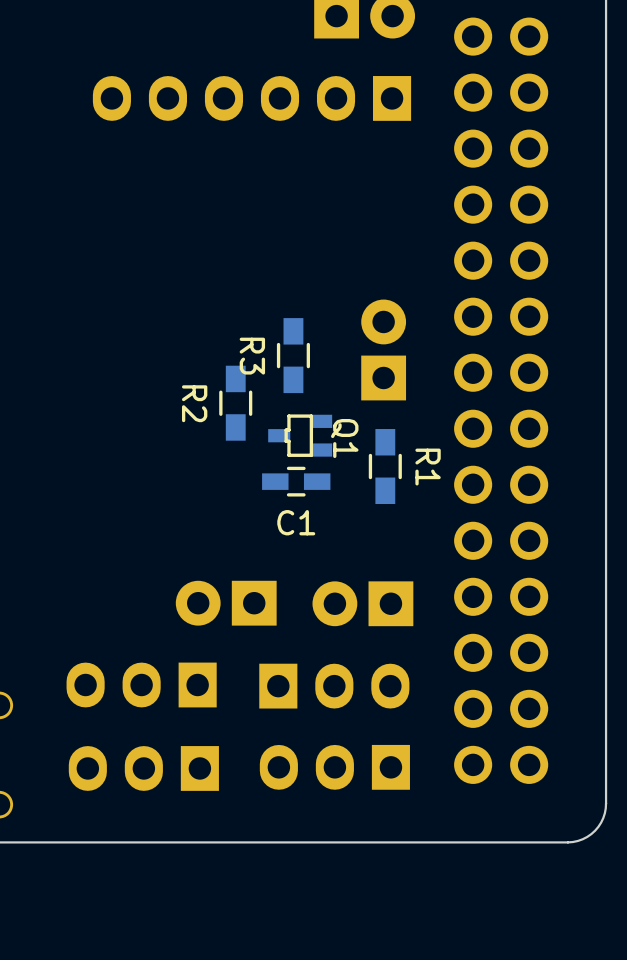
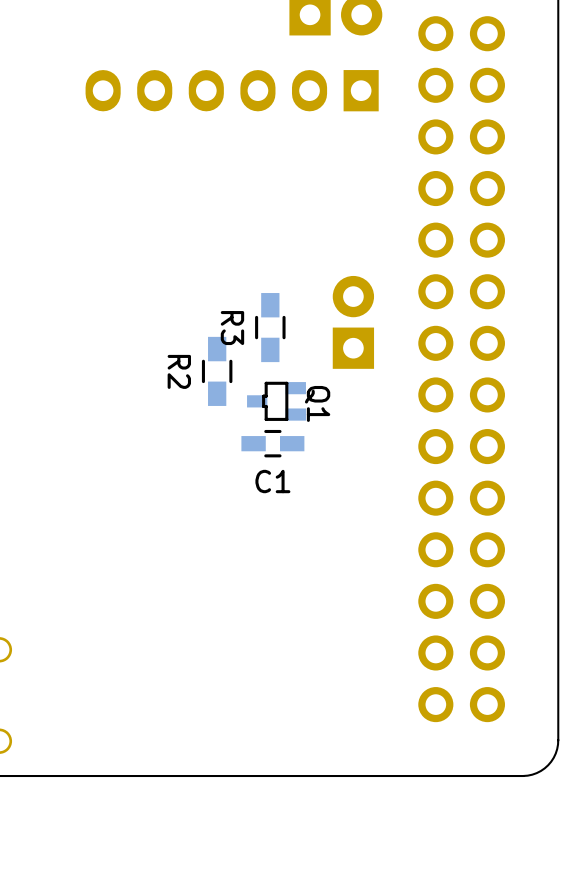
R1: (385, 466) -> none
part: (226, 603) -> none
part: (362, 603) -> none
part: (141, 684) -> none
part: (334, 686) -> none
part: (334, 767) -> none
part: (143, 768) -> none

